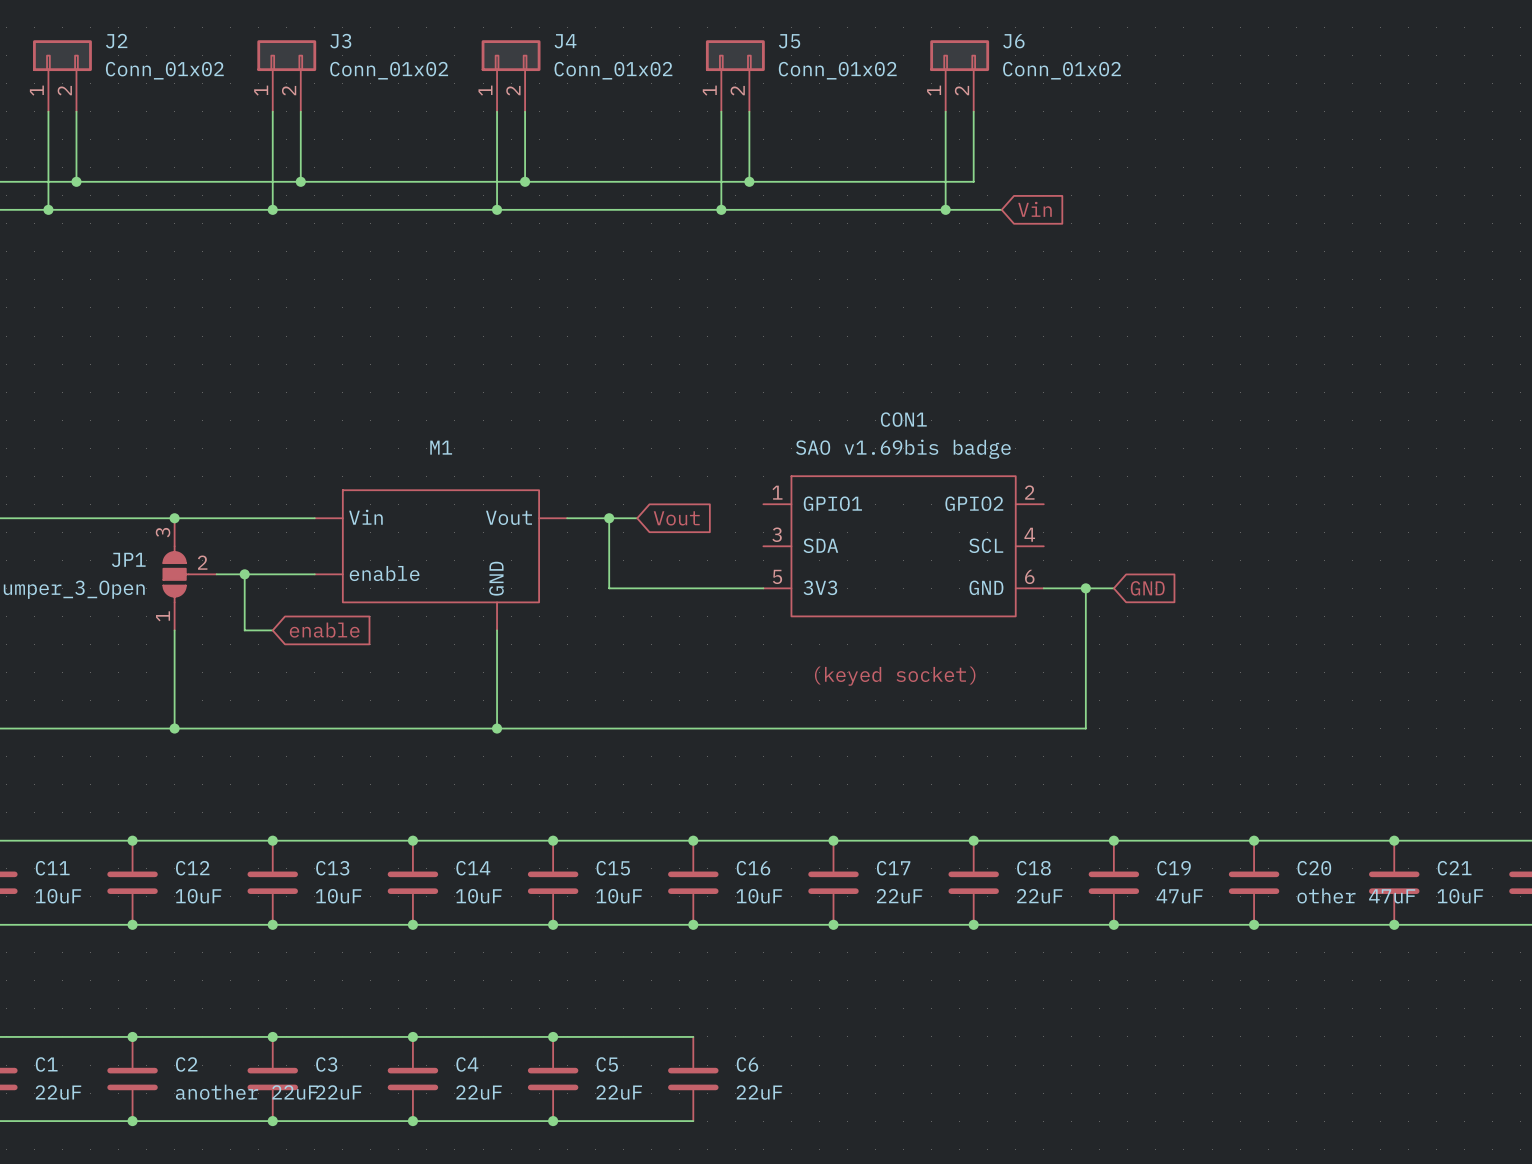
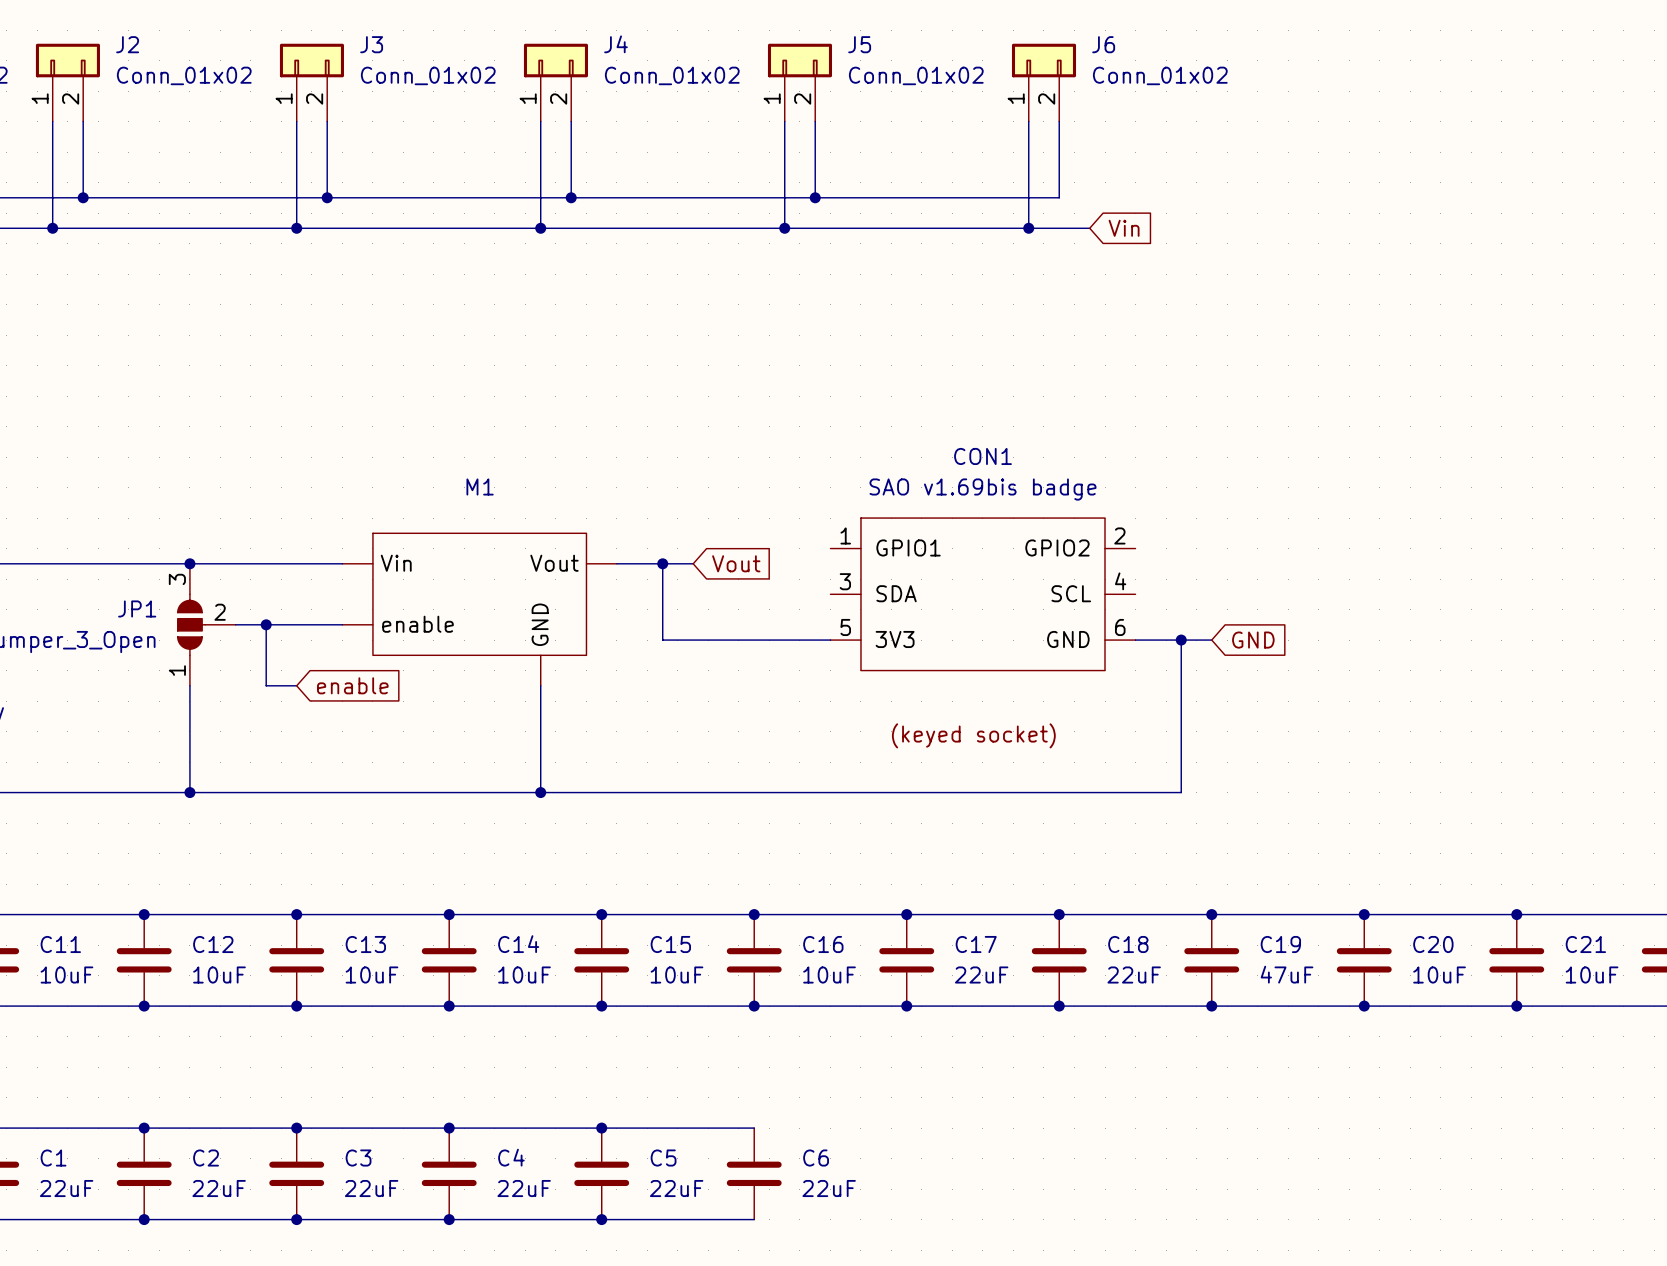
C20 value: other 47uF (1356, 895) -> 10uF (1439, 975)
C2 value: another 22uF (246, 1092) -> 22uF (219, 1188)

